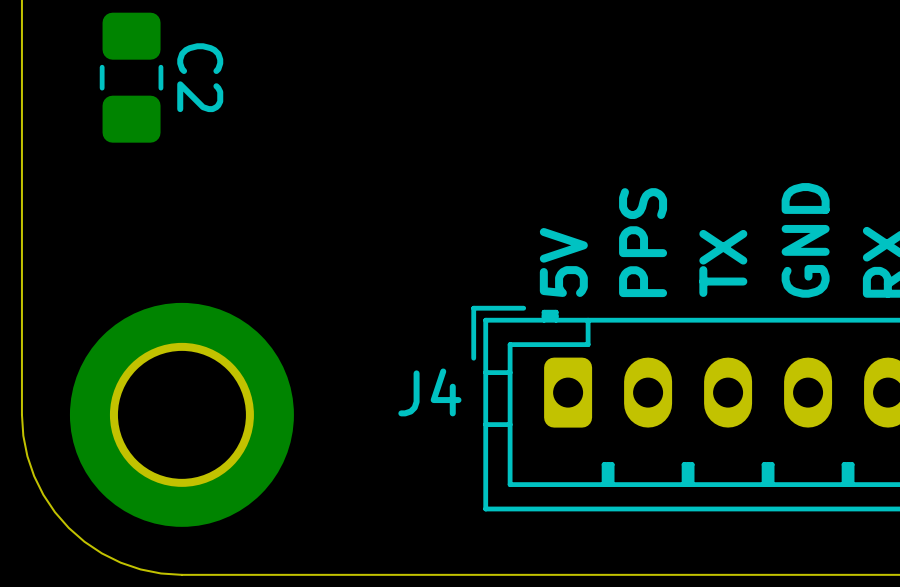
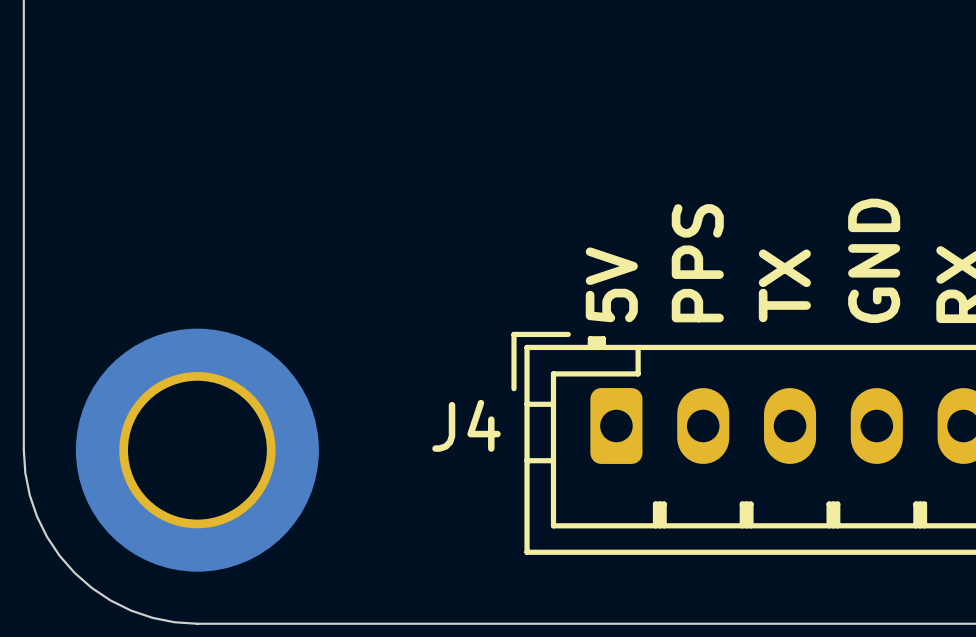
C2: (131, 77) -> none

